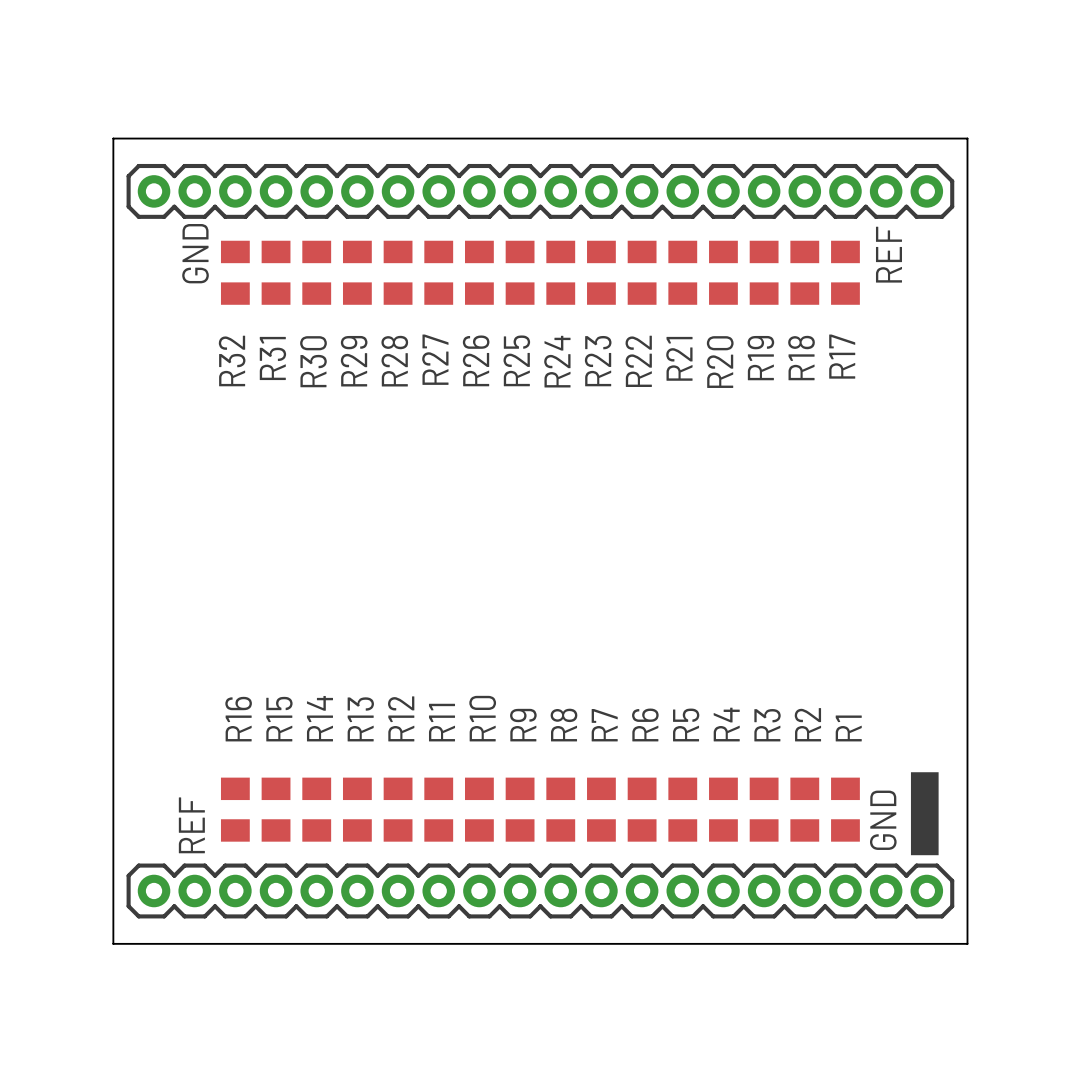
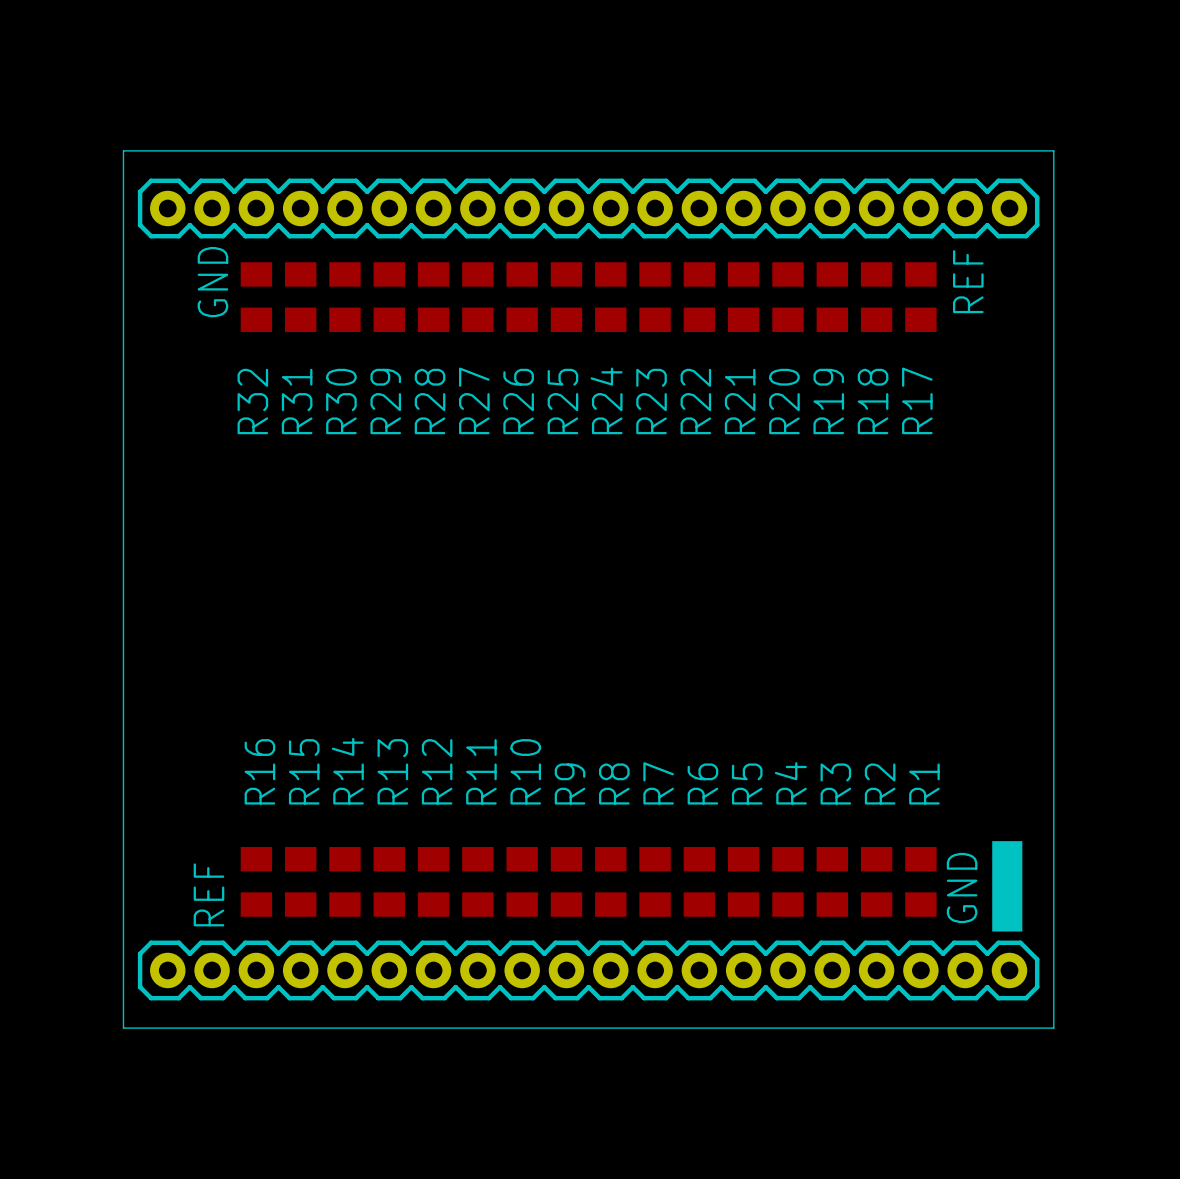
board edge: (113, 138) (967, 138) (967, 943) (113, 943) (113, 138) -> none
line: none -> (123, 150) (1053, 150) (1053, 1028) (123, 1028) (123, 150)

